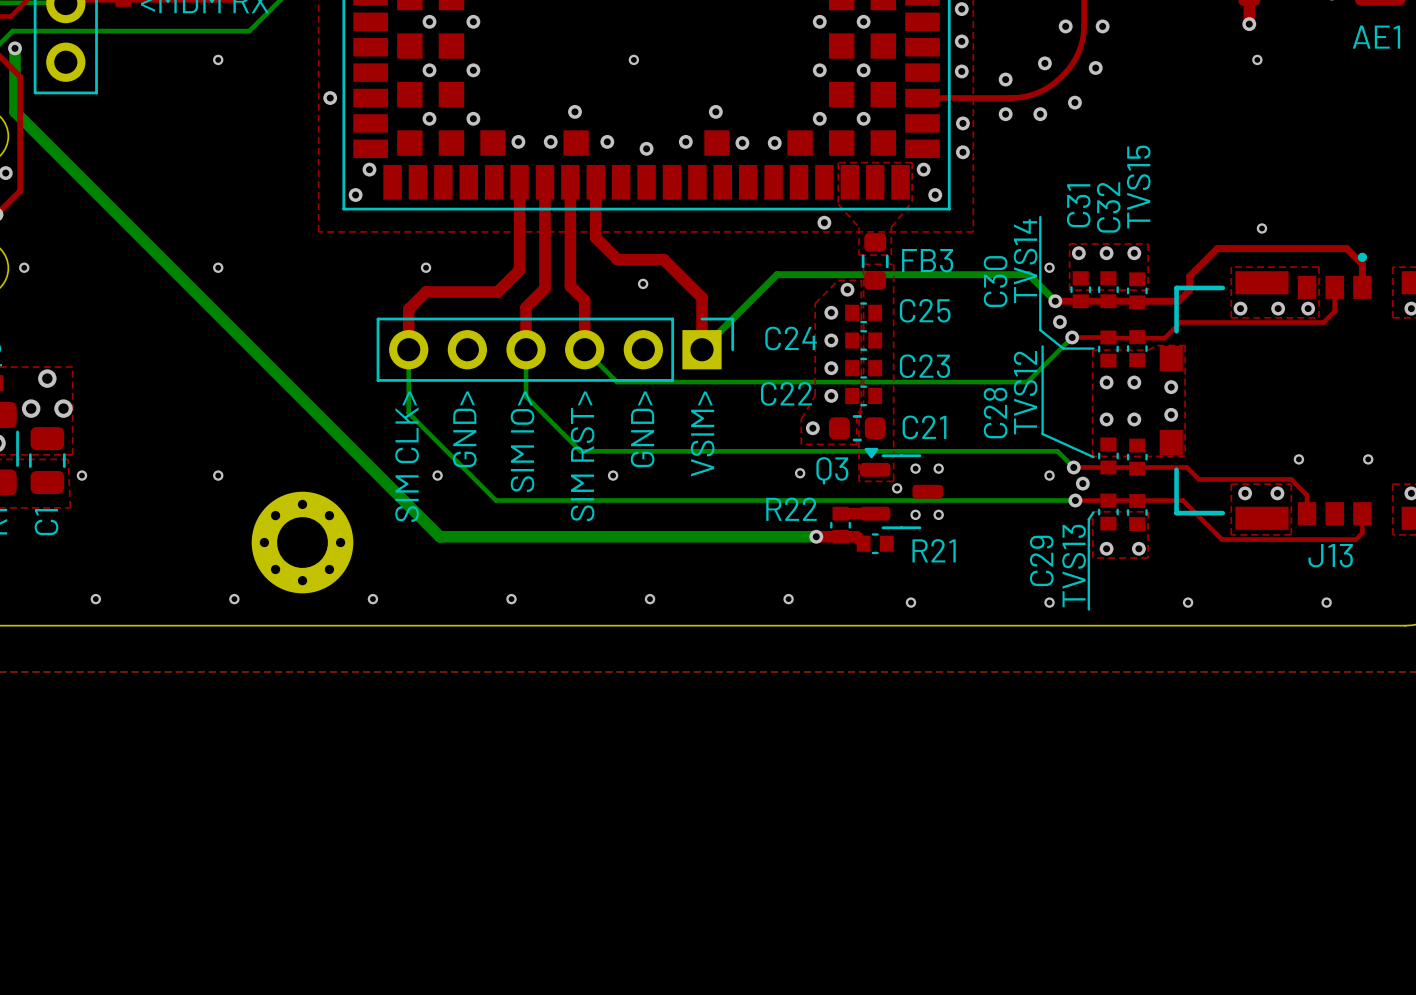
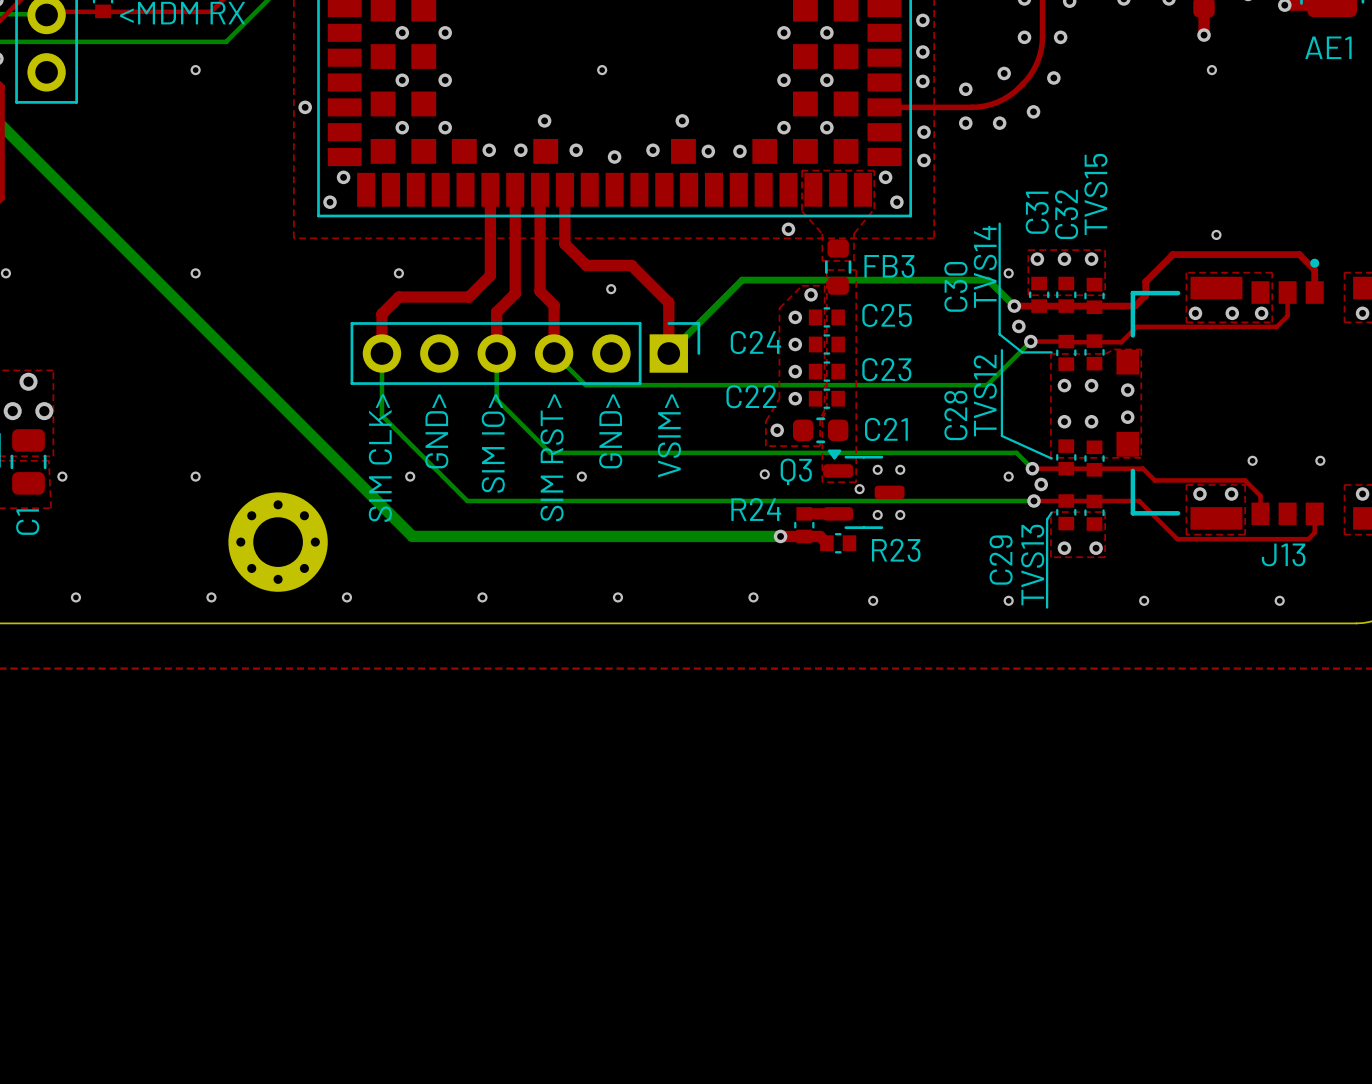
R22 name: R22 (791, 509) -> R24 (756, 509)
R21 name: R21 (934, 550) -> R23 (896, 550)

